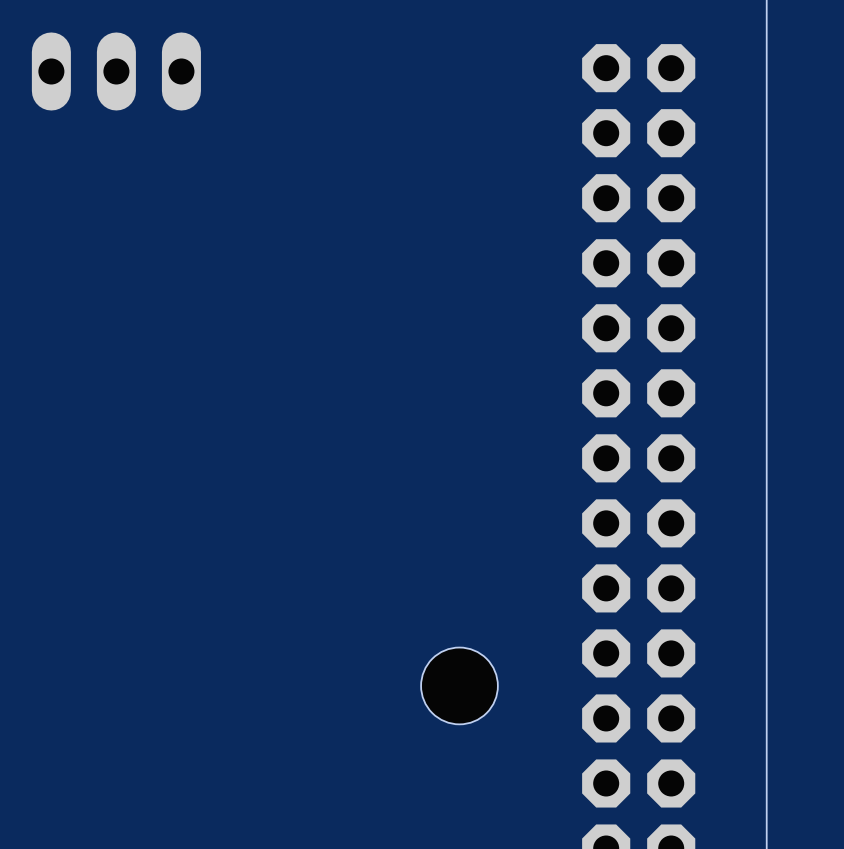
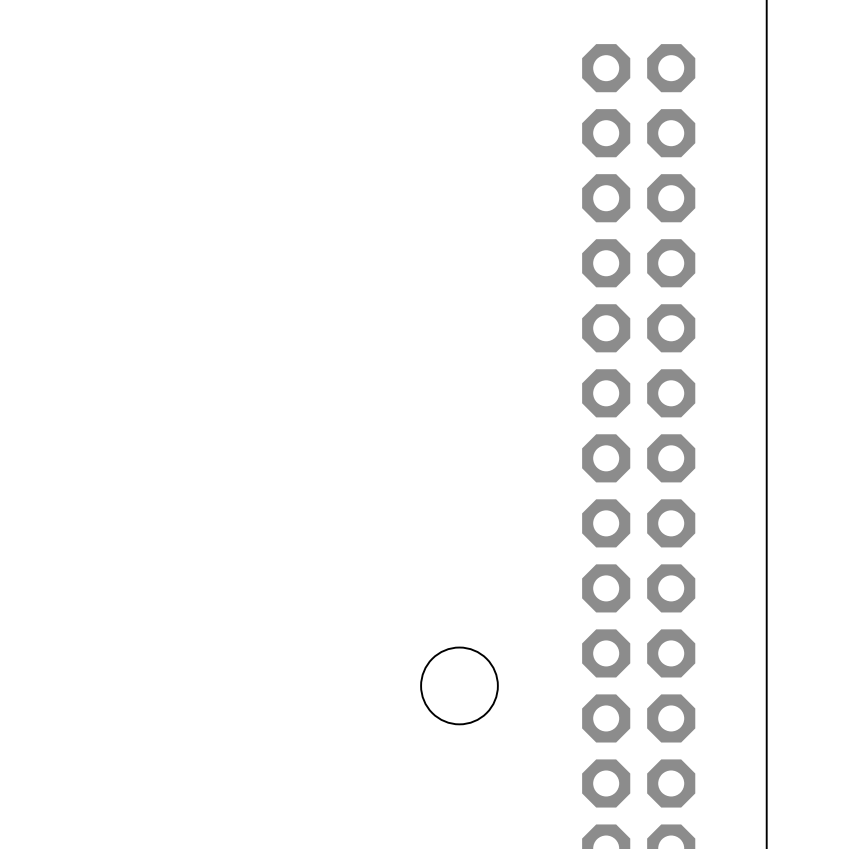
part: (116, 71) -> none

